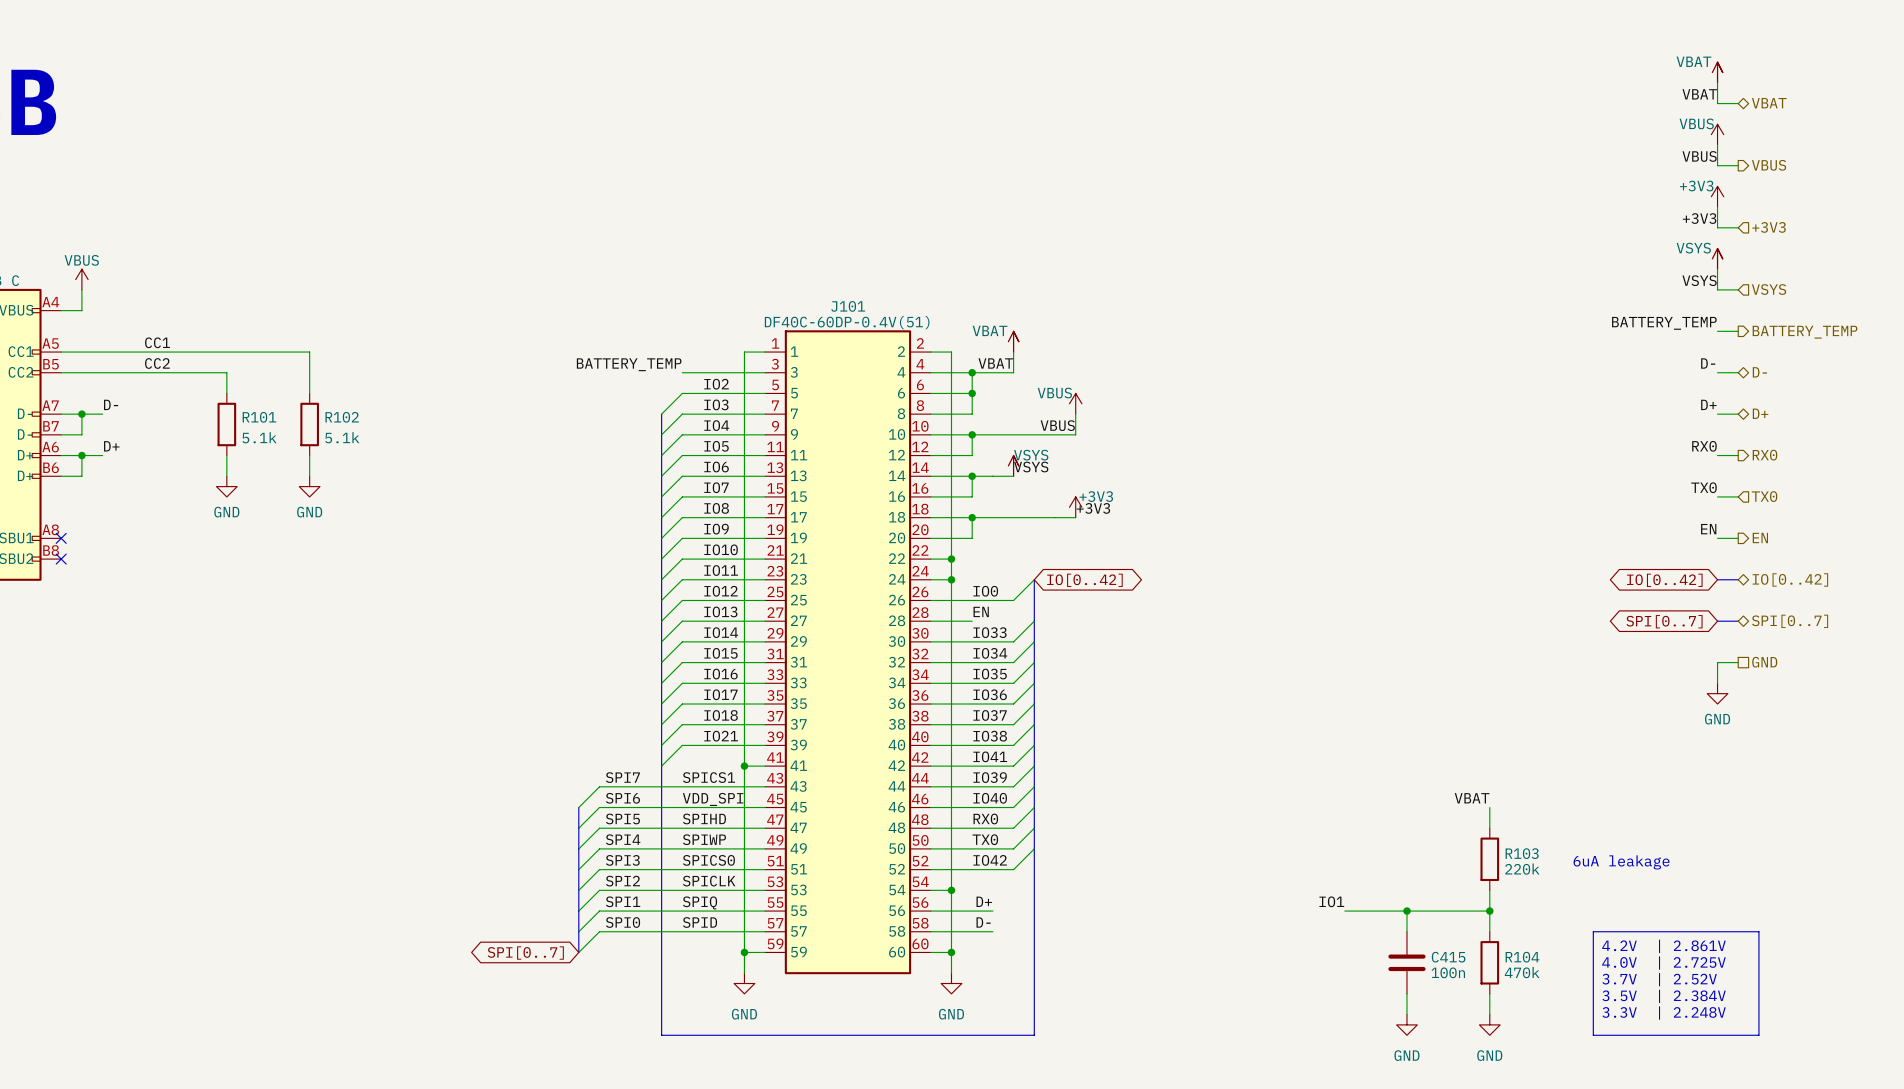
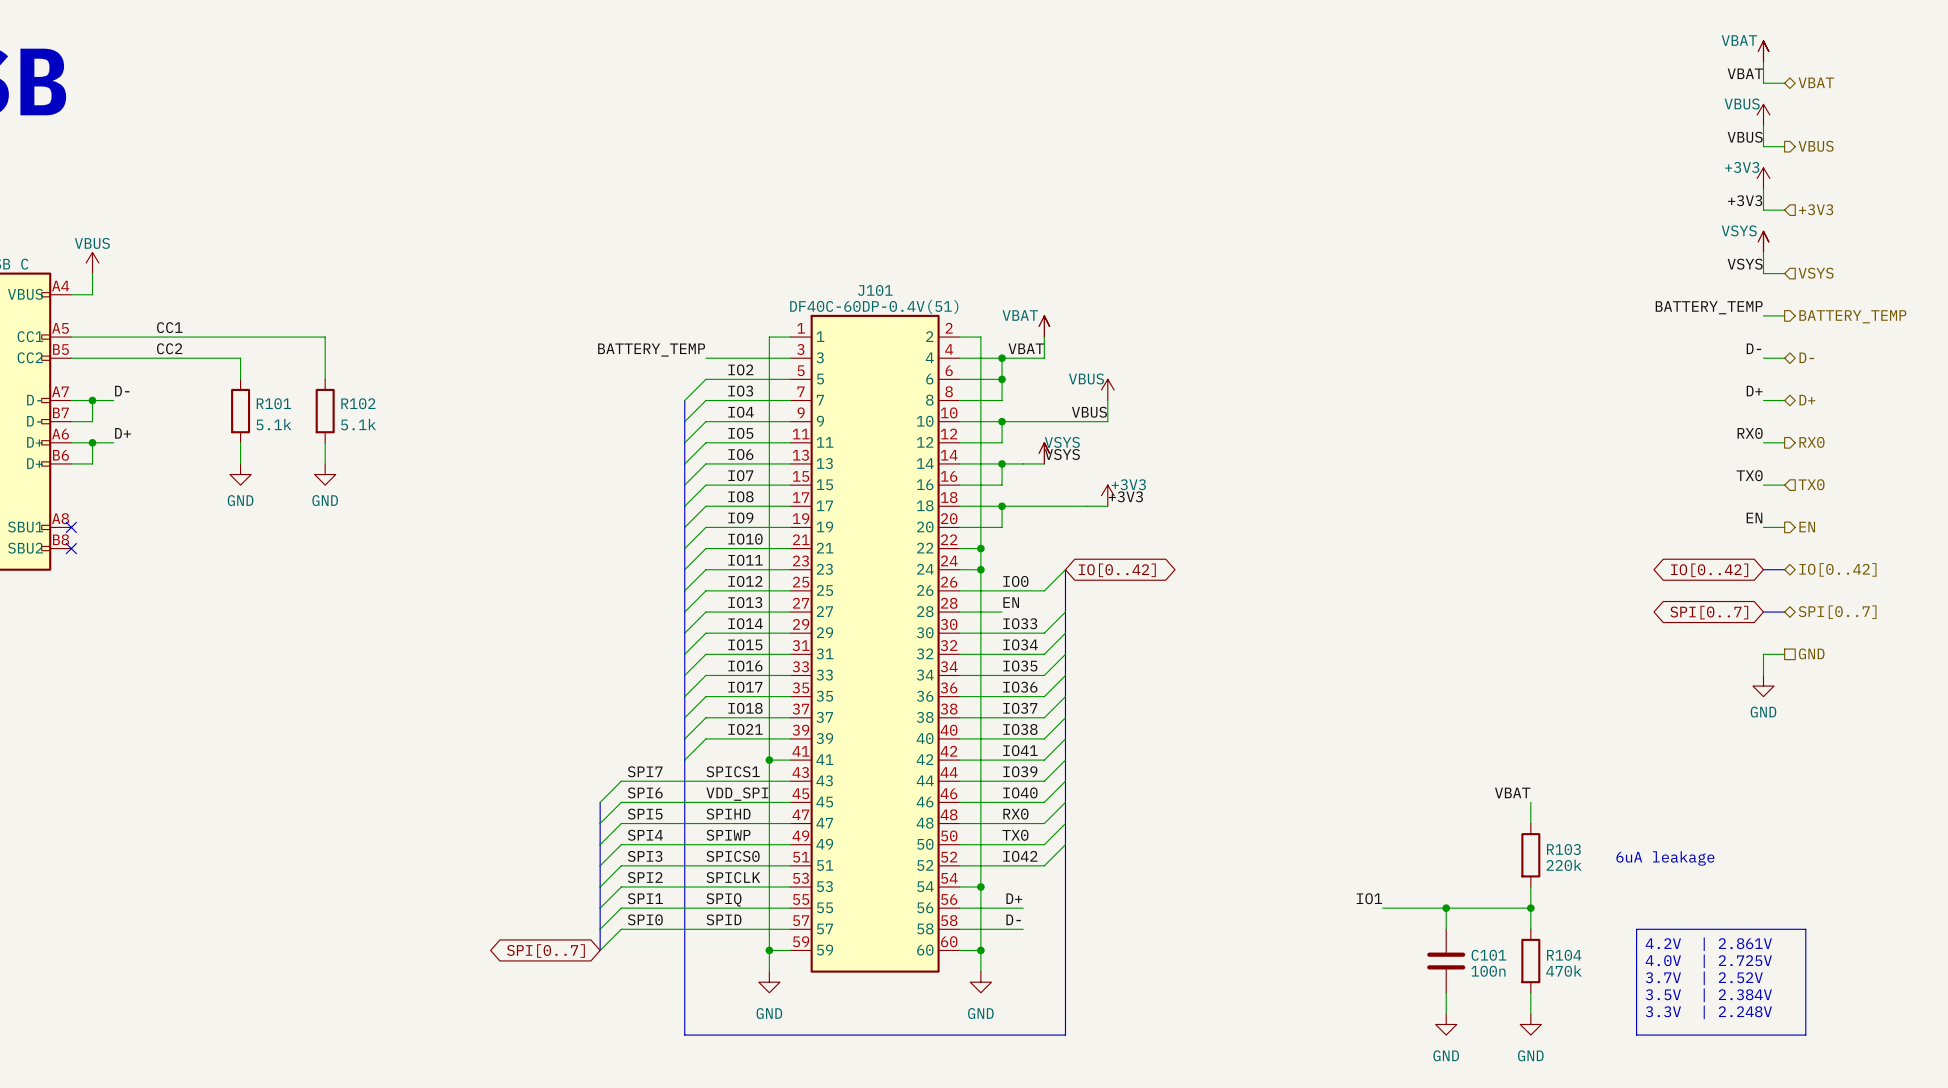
C415 name: C415 (1448, 957) -> C101 (1488, 955)

